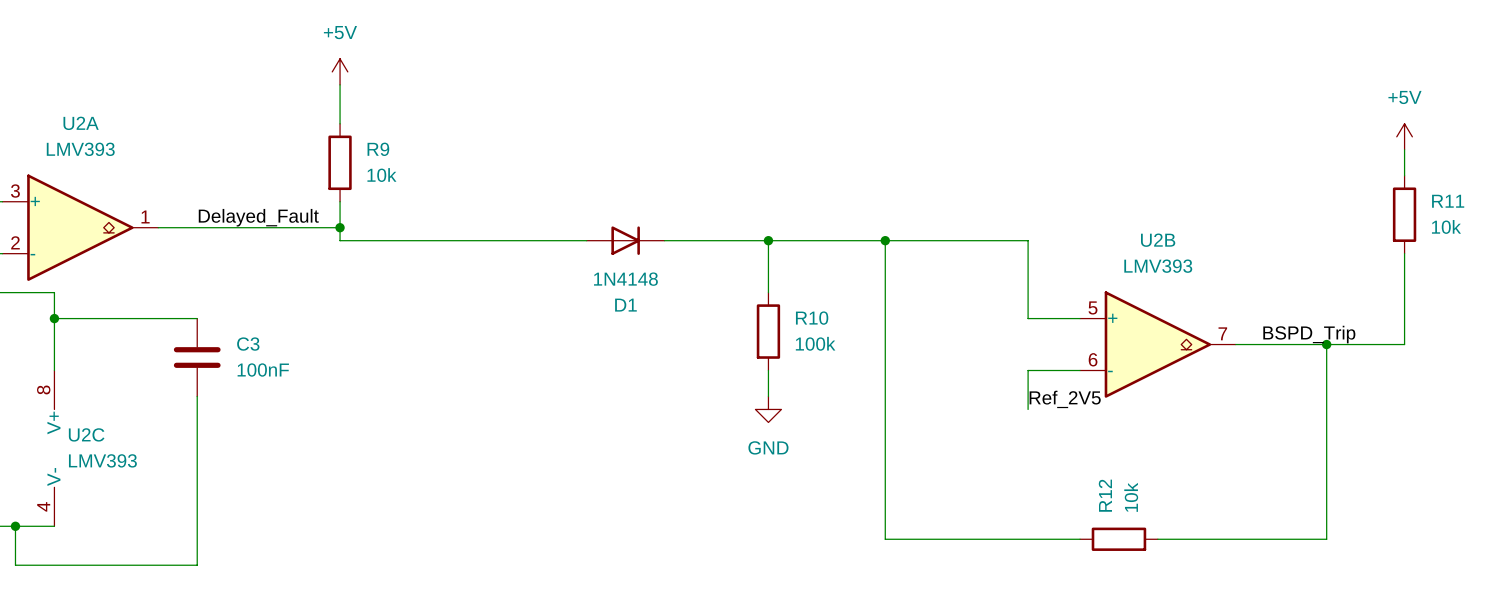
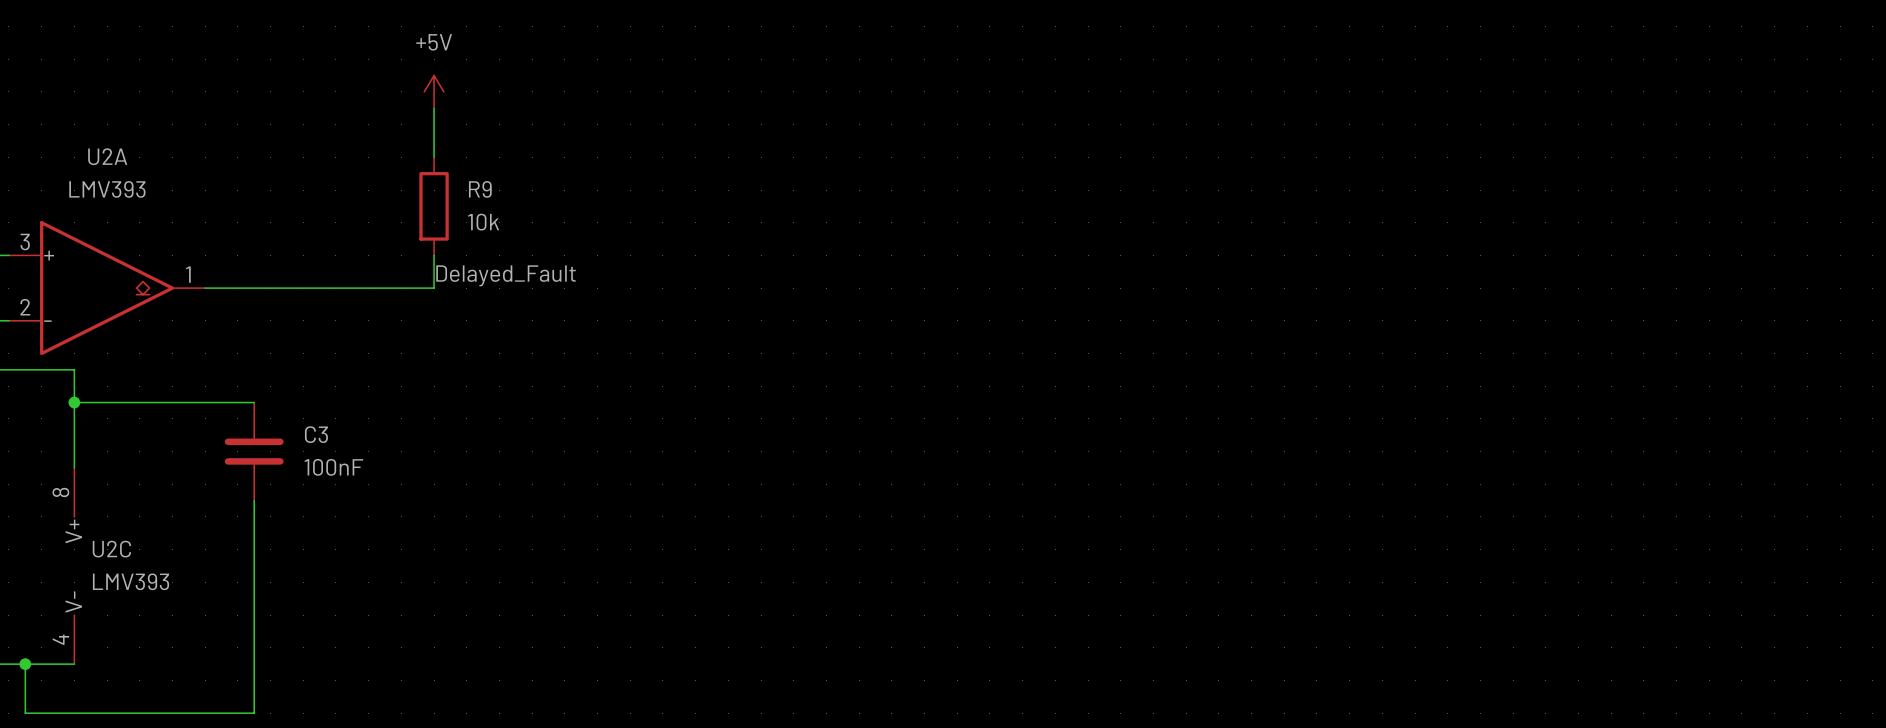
power symbol: +5V (1404, 136) -> none
wire: (1404, 149) (1404, 175) -> none
R11: 10k (1404, 214) -> none
label position: Delayed_Fault (258, 217) -> Delayed_Fault (506, 275)
wire: (340, 227) (340, 240) (586, 240) -> none
junction: (340, 227) -> none
D1: 1N4148 (625, 240) -> none
wire: (664, 240) (1028, 240) (1028, 318) (1080, 318) -> none
wire: (768, 240) (768, 292) -> none
junction: (768, 240) -> none
wire: (885, 240) (885, 539) (1080, 539) -> none
junction: (885, 240) -> none
wire: (1404, 253) (1404, 344) (1235, 344) -> none
R10: 100k (768, 331) -> none
label: BSPD_Trip (1309, 334) -> none
U2B: LMV393 (1157, 344) -> none
wire: (1326, 344) (1326, 539) (1157, 539) -> none
junction: (1326, 344) -> none
wire: (768, 370) (768, 396) -> none
wire: (1080, 370) (1028, 370) (1028, 409) -> none
label: Ref_2V5 (1065, 399) -> none
power symbol: GND (768, 409) -> none
R12: 10k (1118, 539) -> none

